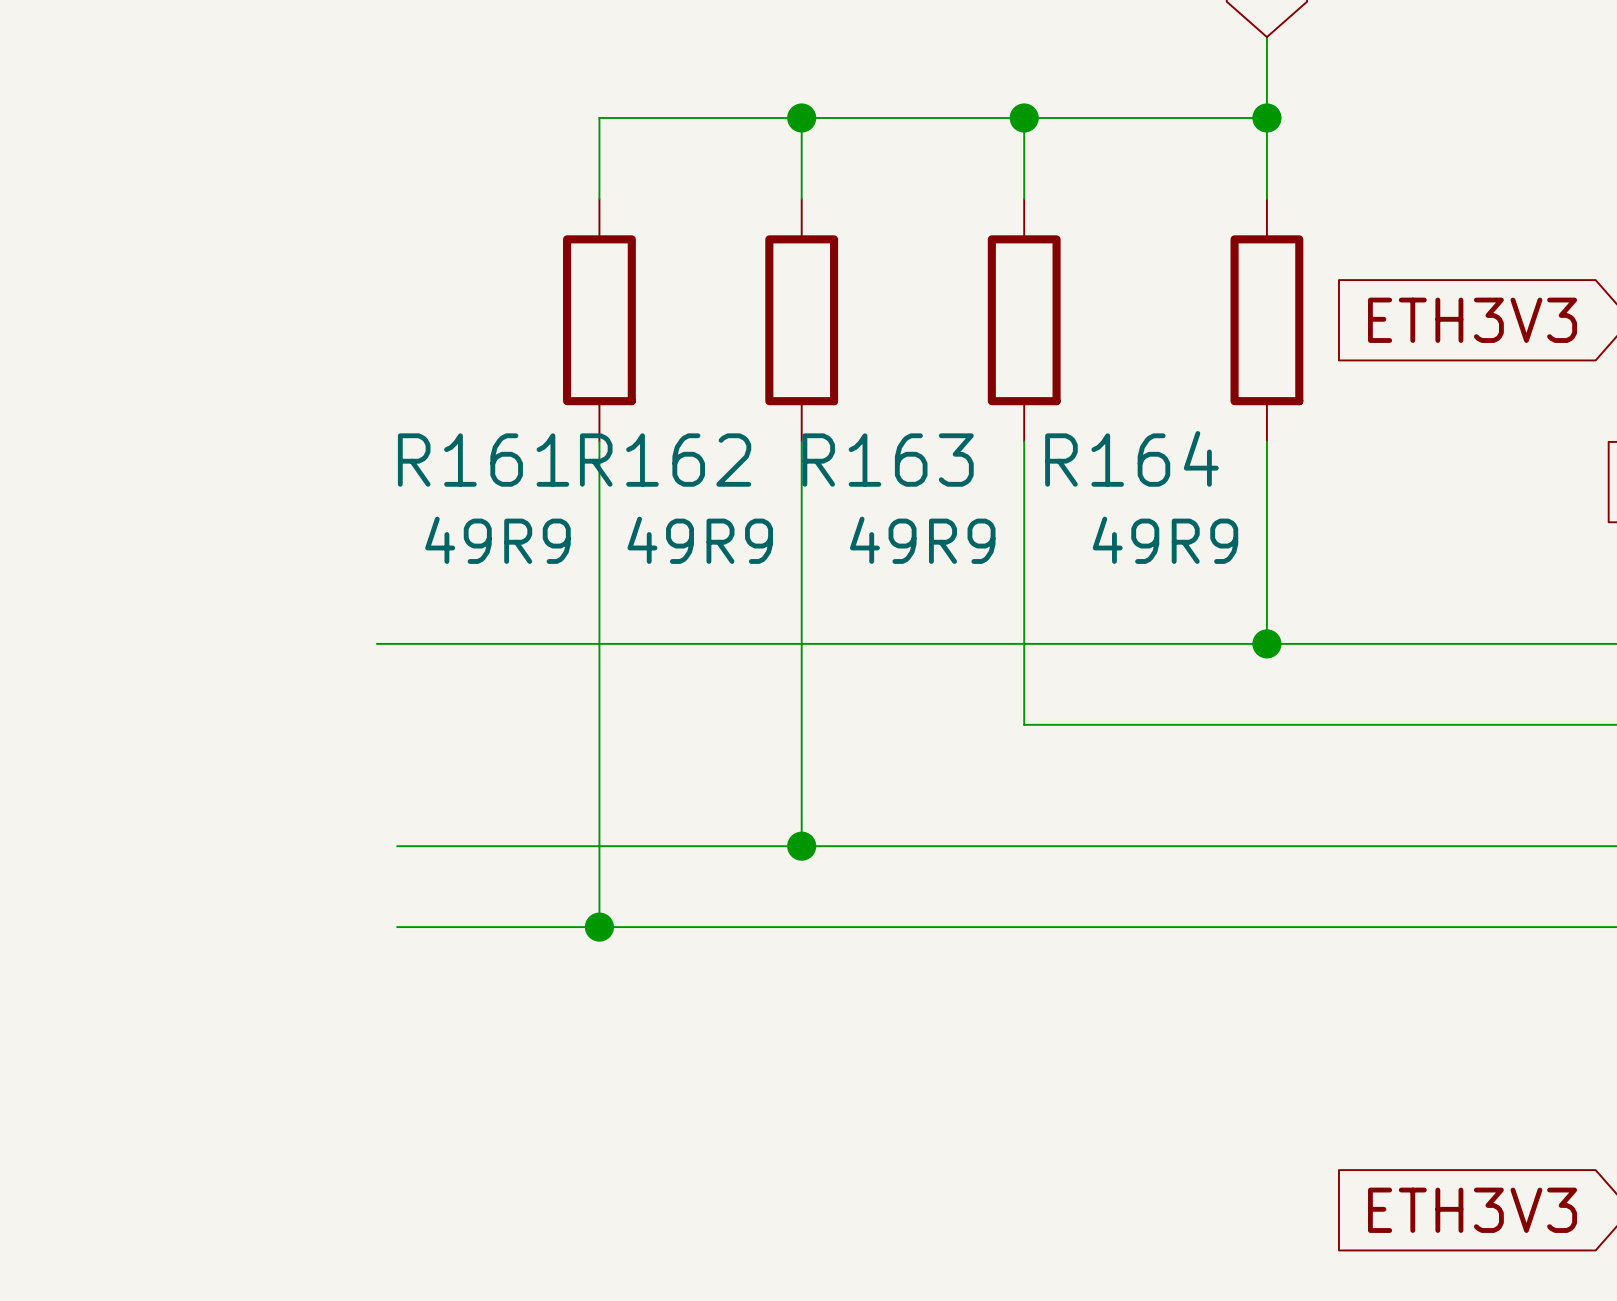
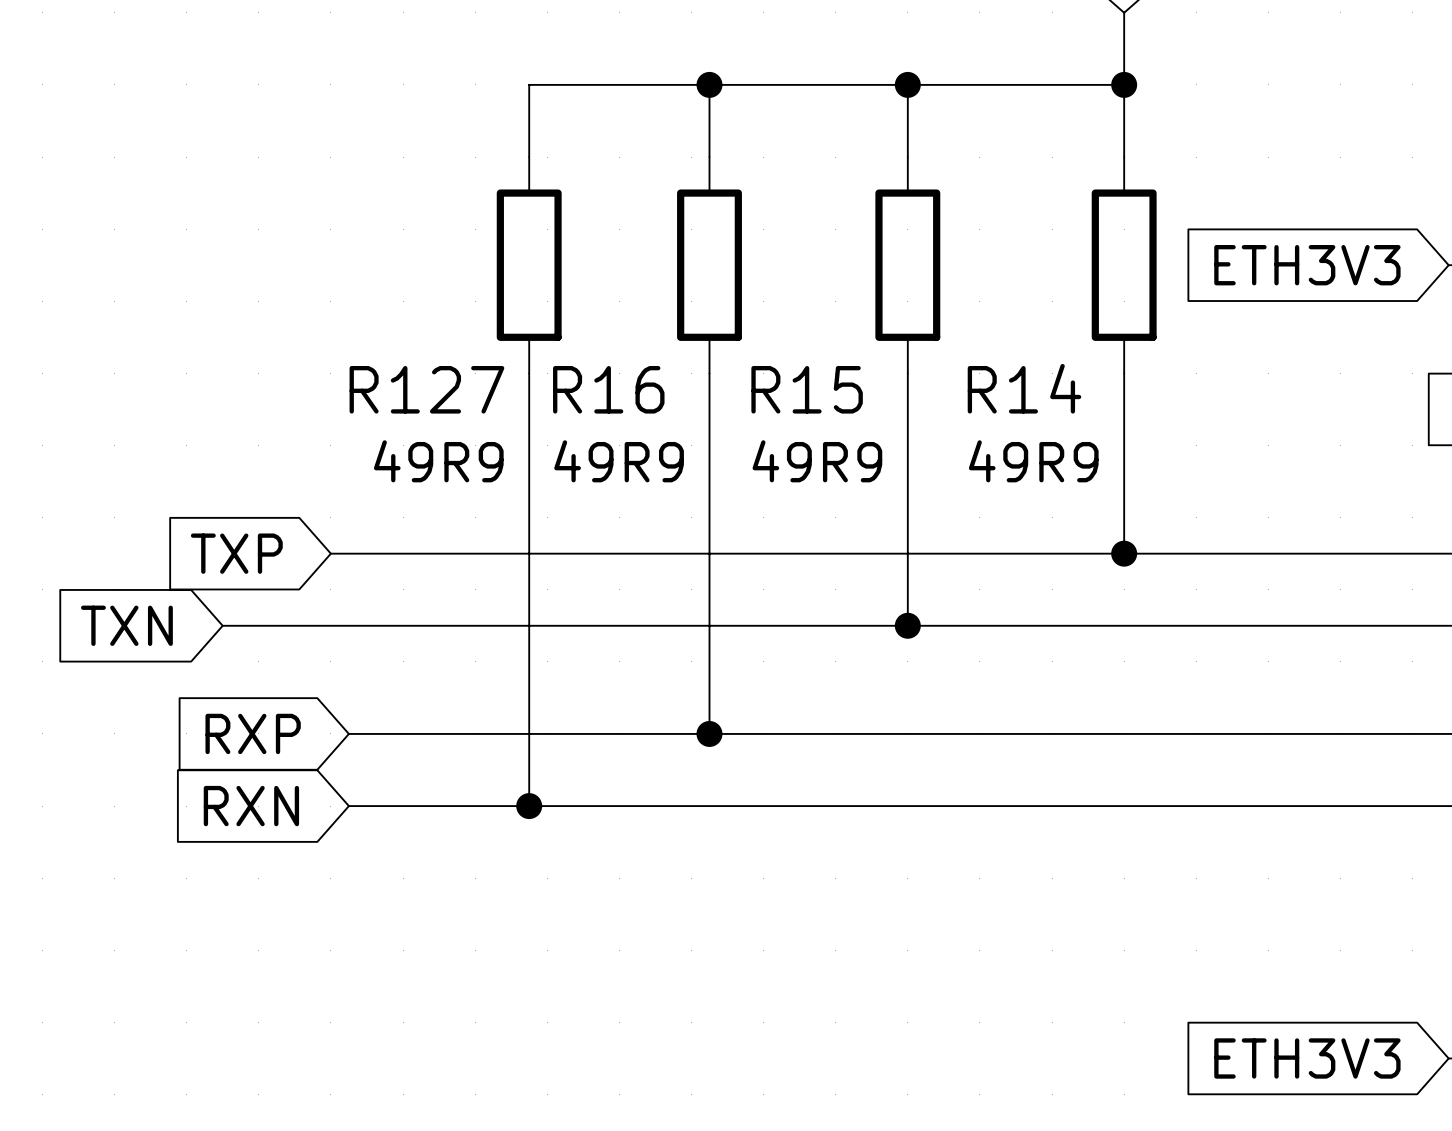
R164 name: R164 (1131, 458) -> R14 (1024, 388)
R161 name: R161 (483, 460) -> R127 (426, 389)
R162 name: R162 (665, 460) -> R16 (608, 389)
R163 name: R163 (888, 460) -> R15 (807, 389)
global label: none -> TXP (236, 553)
global label: none -> TXN (126, 625)
wire: none -> (222, 625) (907, 625)
junction: none -> (907, 625)
global label: none -> RXP (253, 733)
global label: none -> RXN (251, 806)

